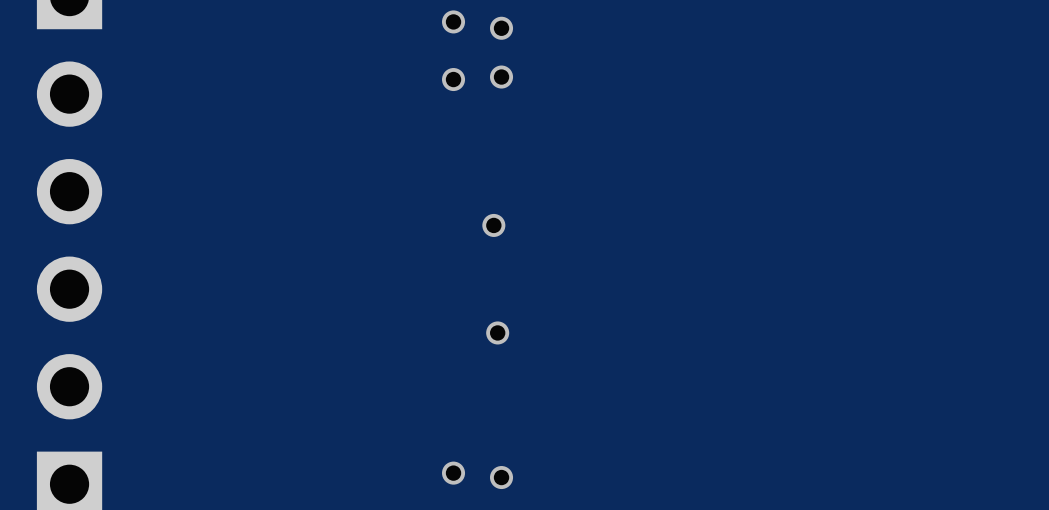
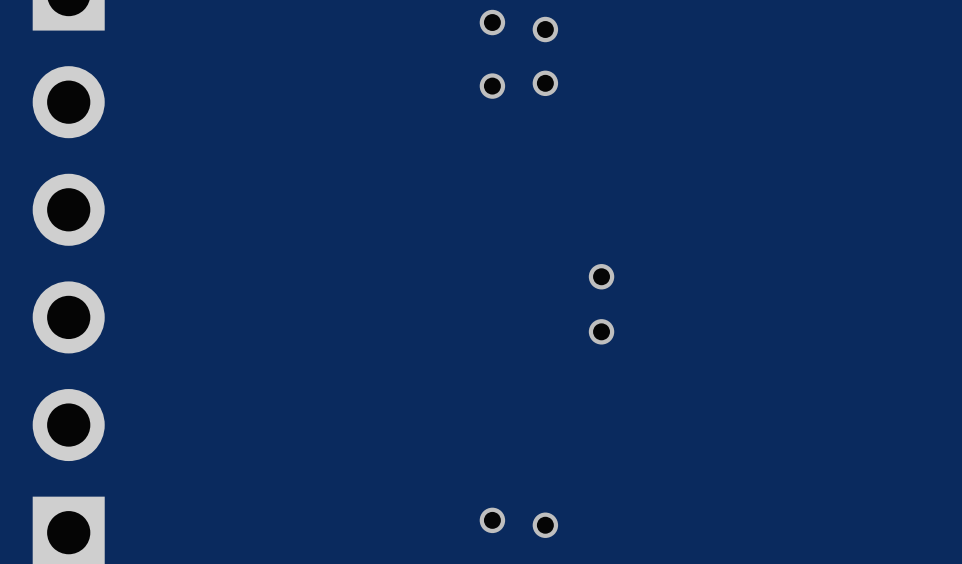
via: (493, 225) -> none
via: none -> (601, 276)
via: none -> (601, 331)
via: (497, 332) -> none

